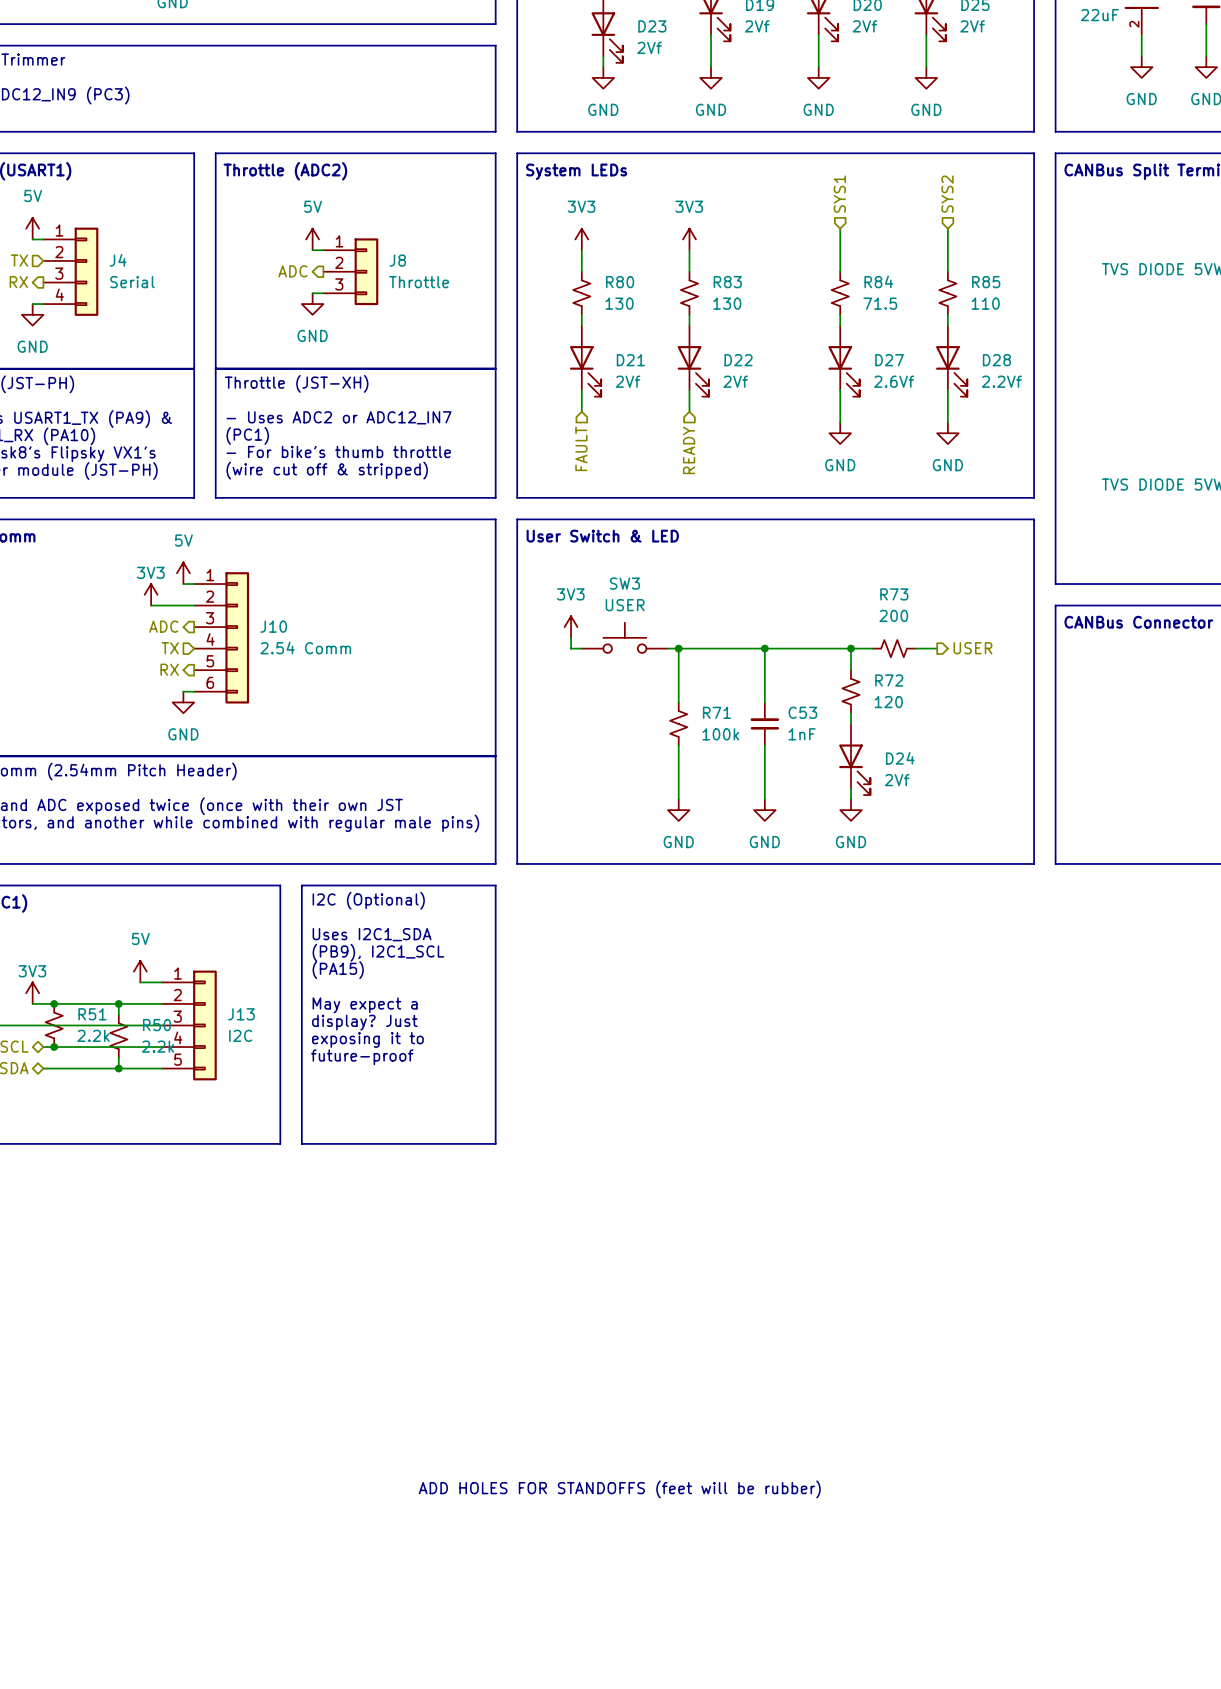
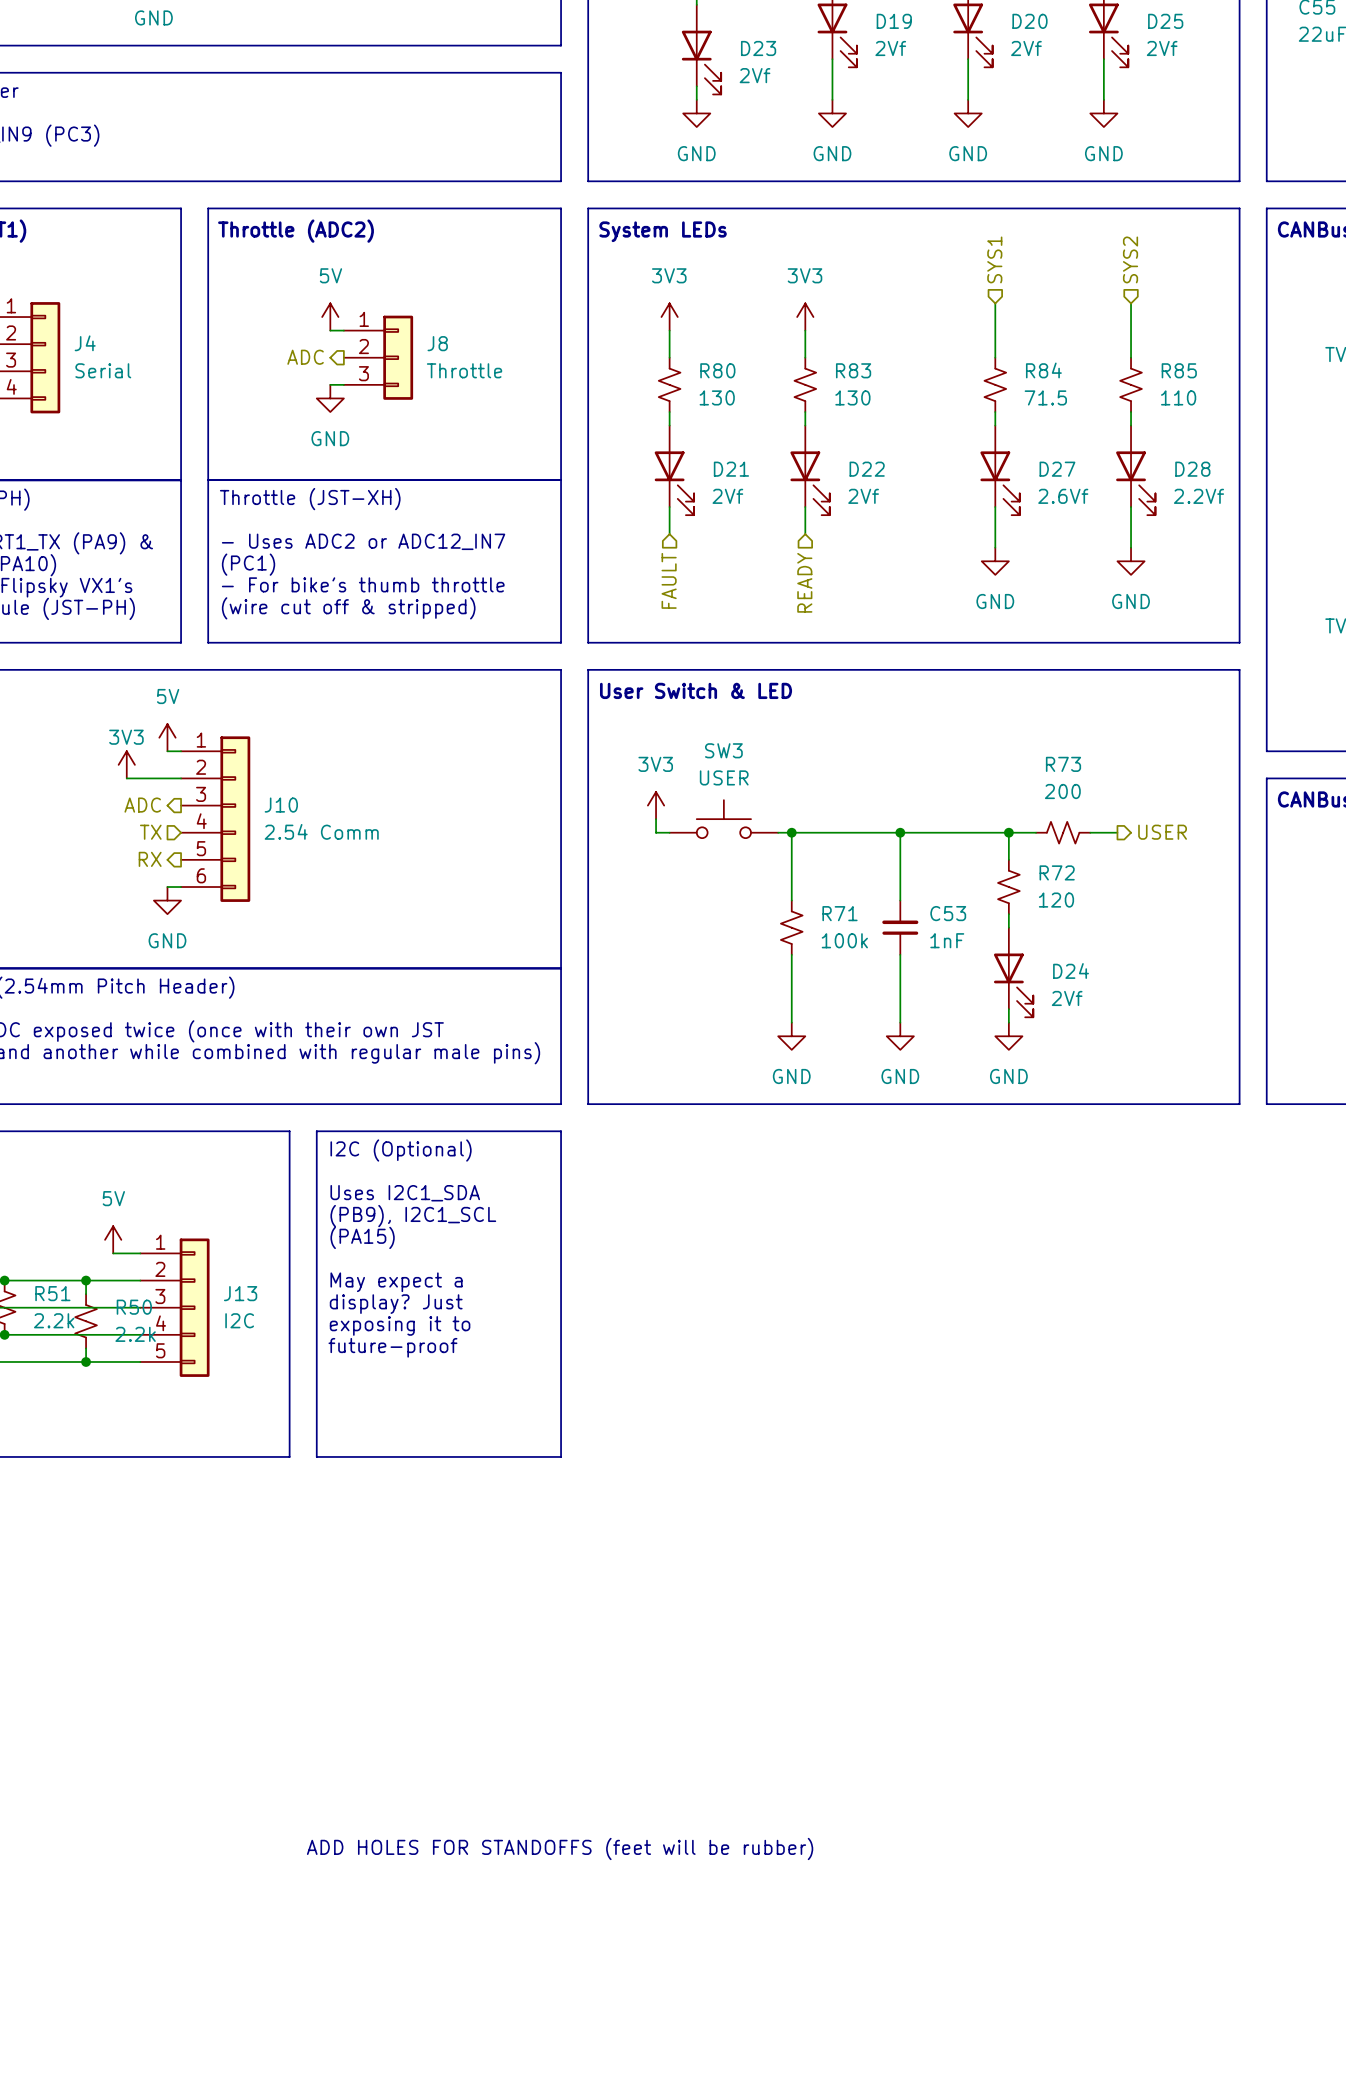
text position: ADD HOLES FOR STANDOFFS (feet will be rubber) (619, 1489) -> ADD HOLES FOR STANDOFFS (feet will be rubber) (560, 1848)

